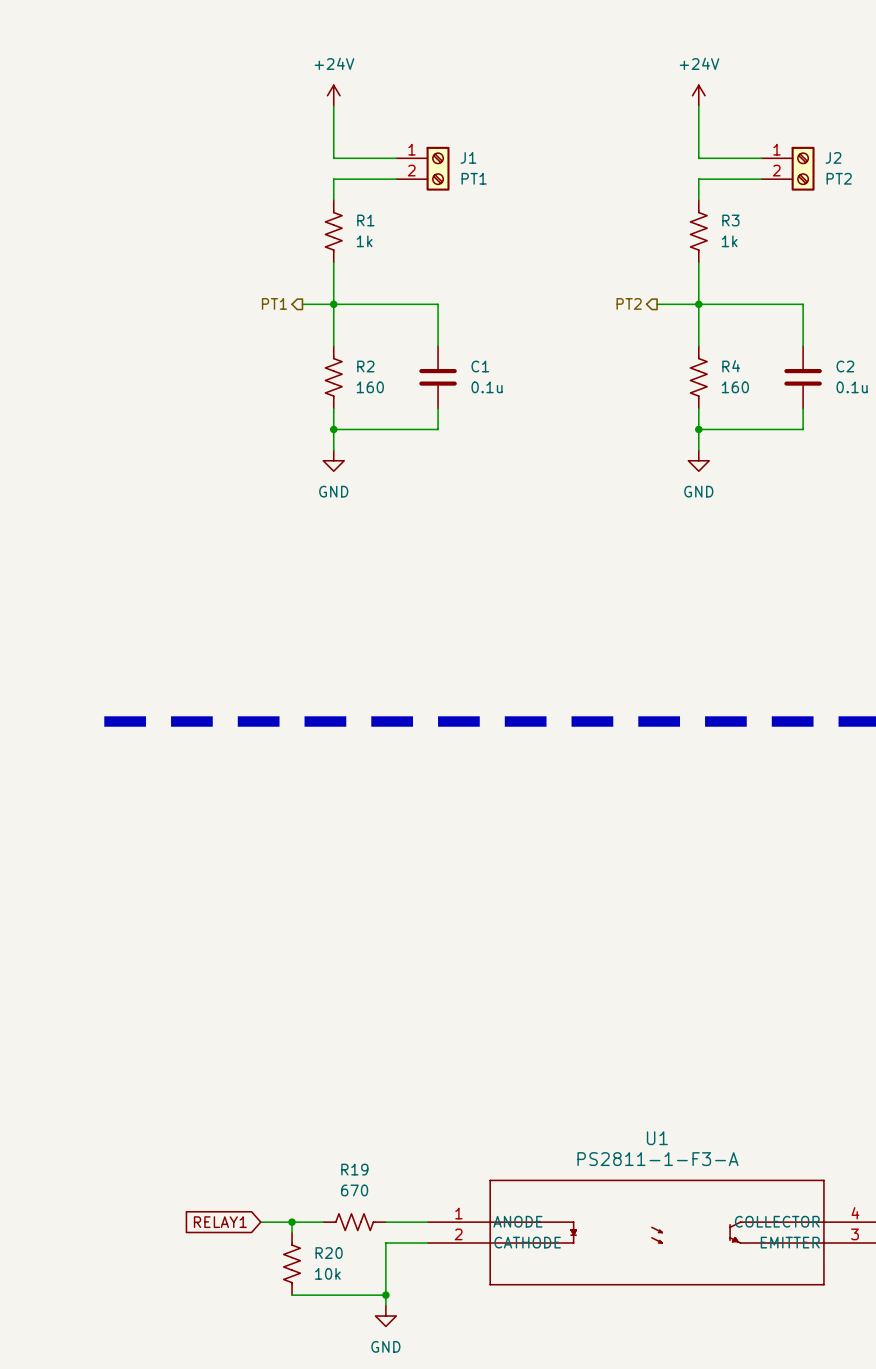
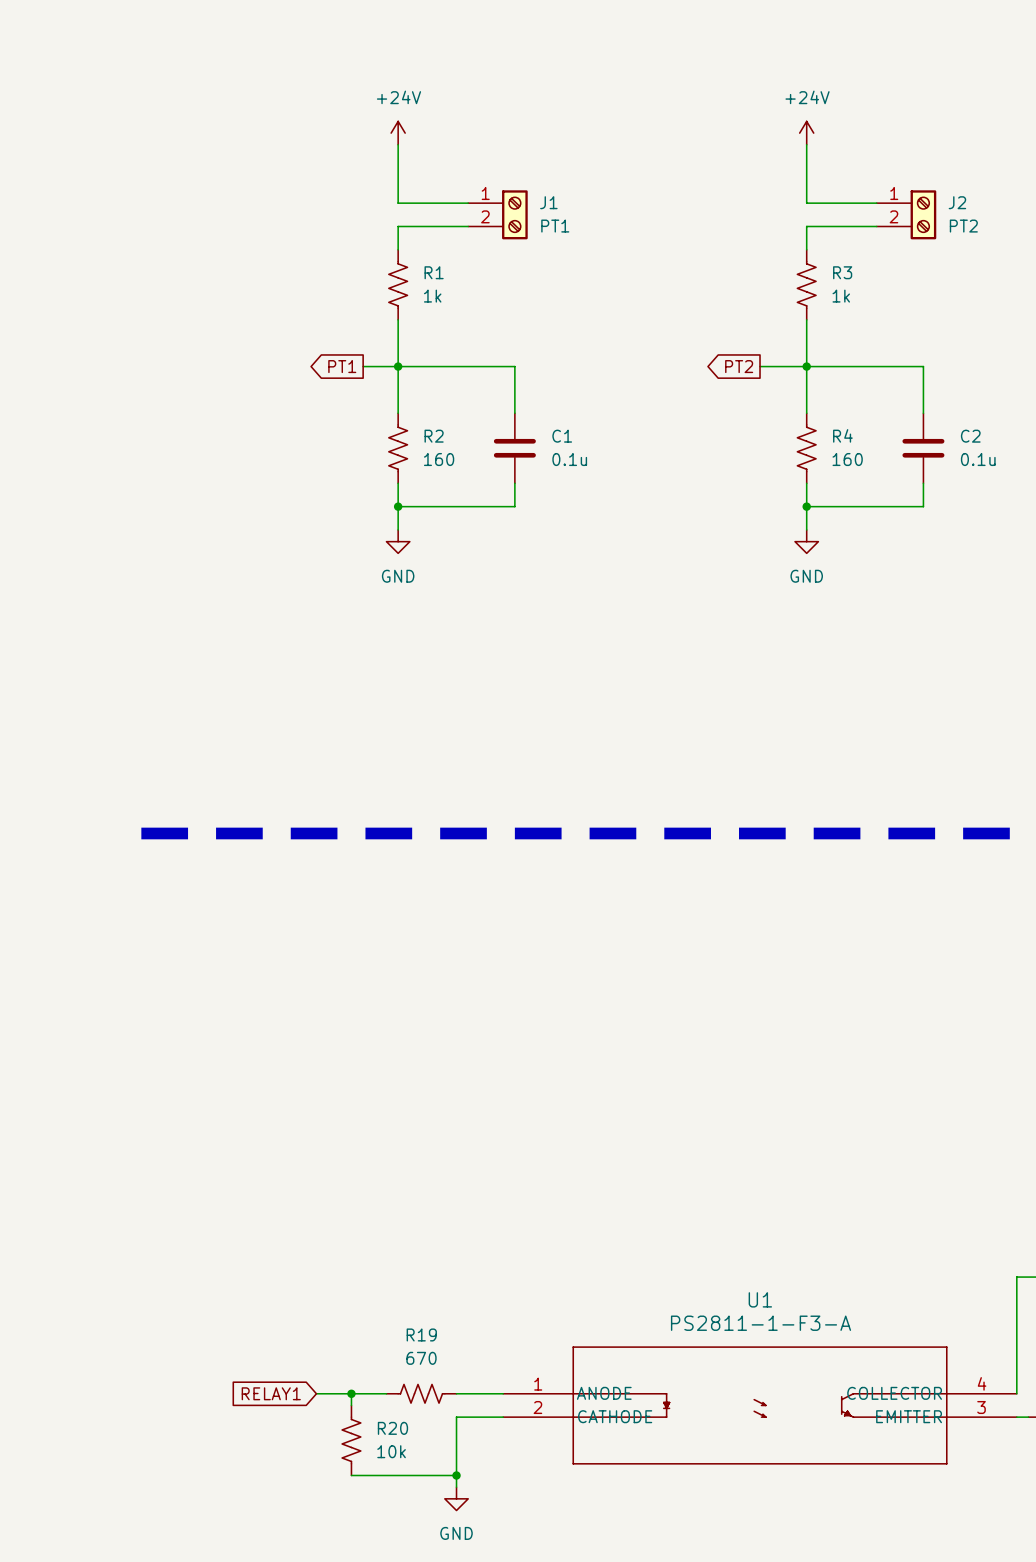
hierarchical label: PT1 (274, 303) -> none
hierarchical label: PT2 (629, 303) -> none
global label: none -> PT1 (342, 366)
global label: none -> PT2 (739, 366)

